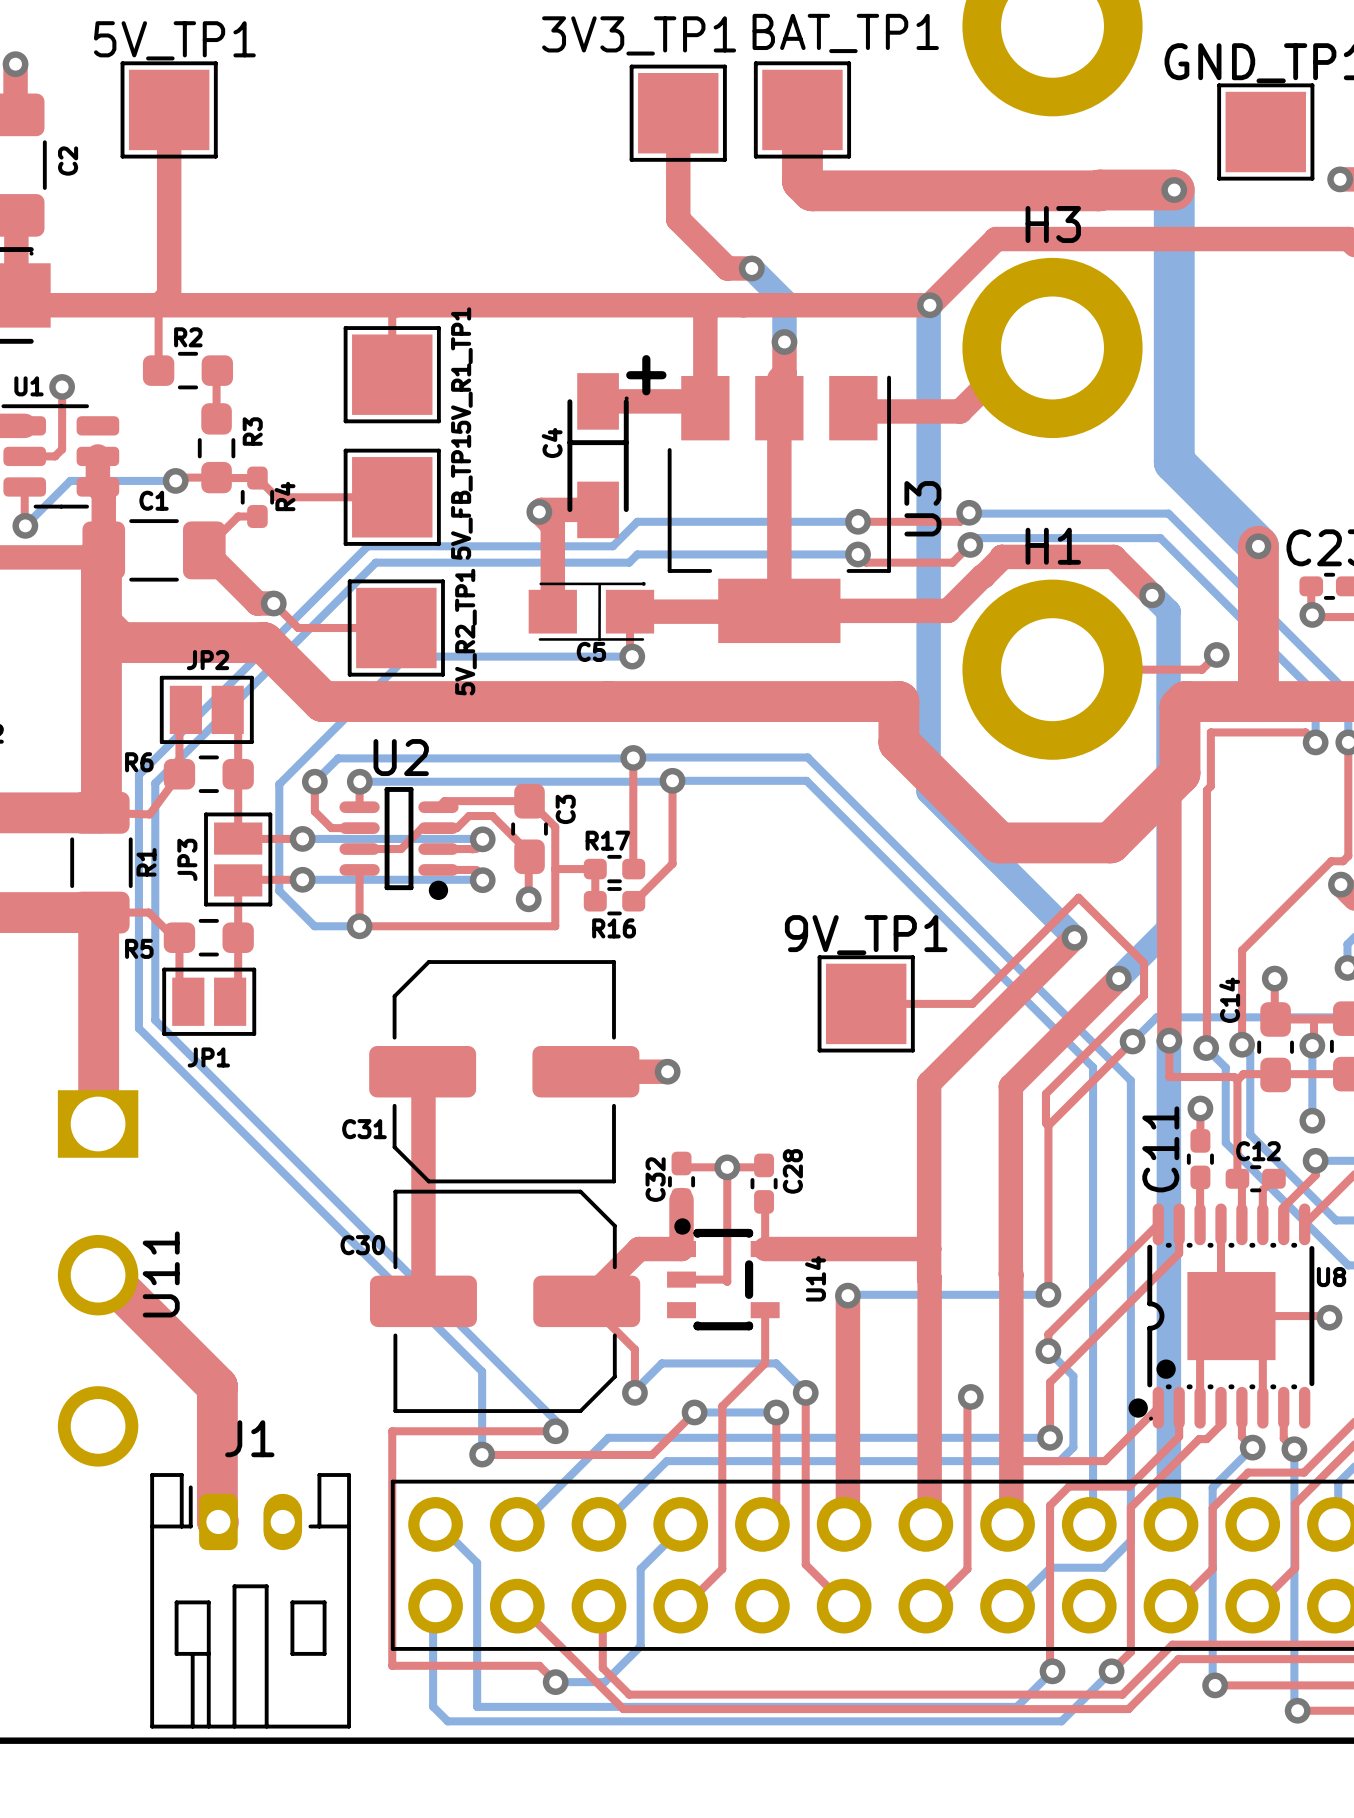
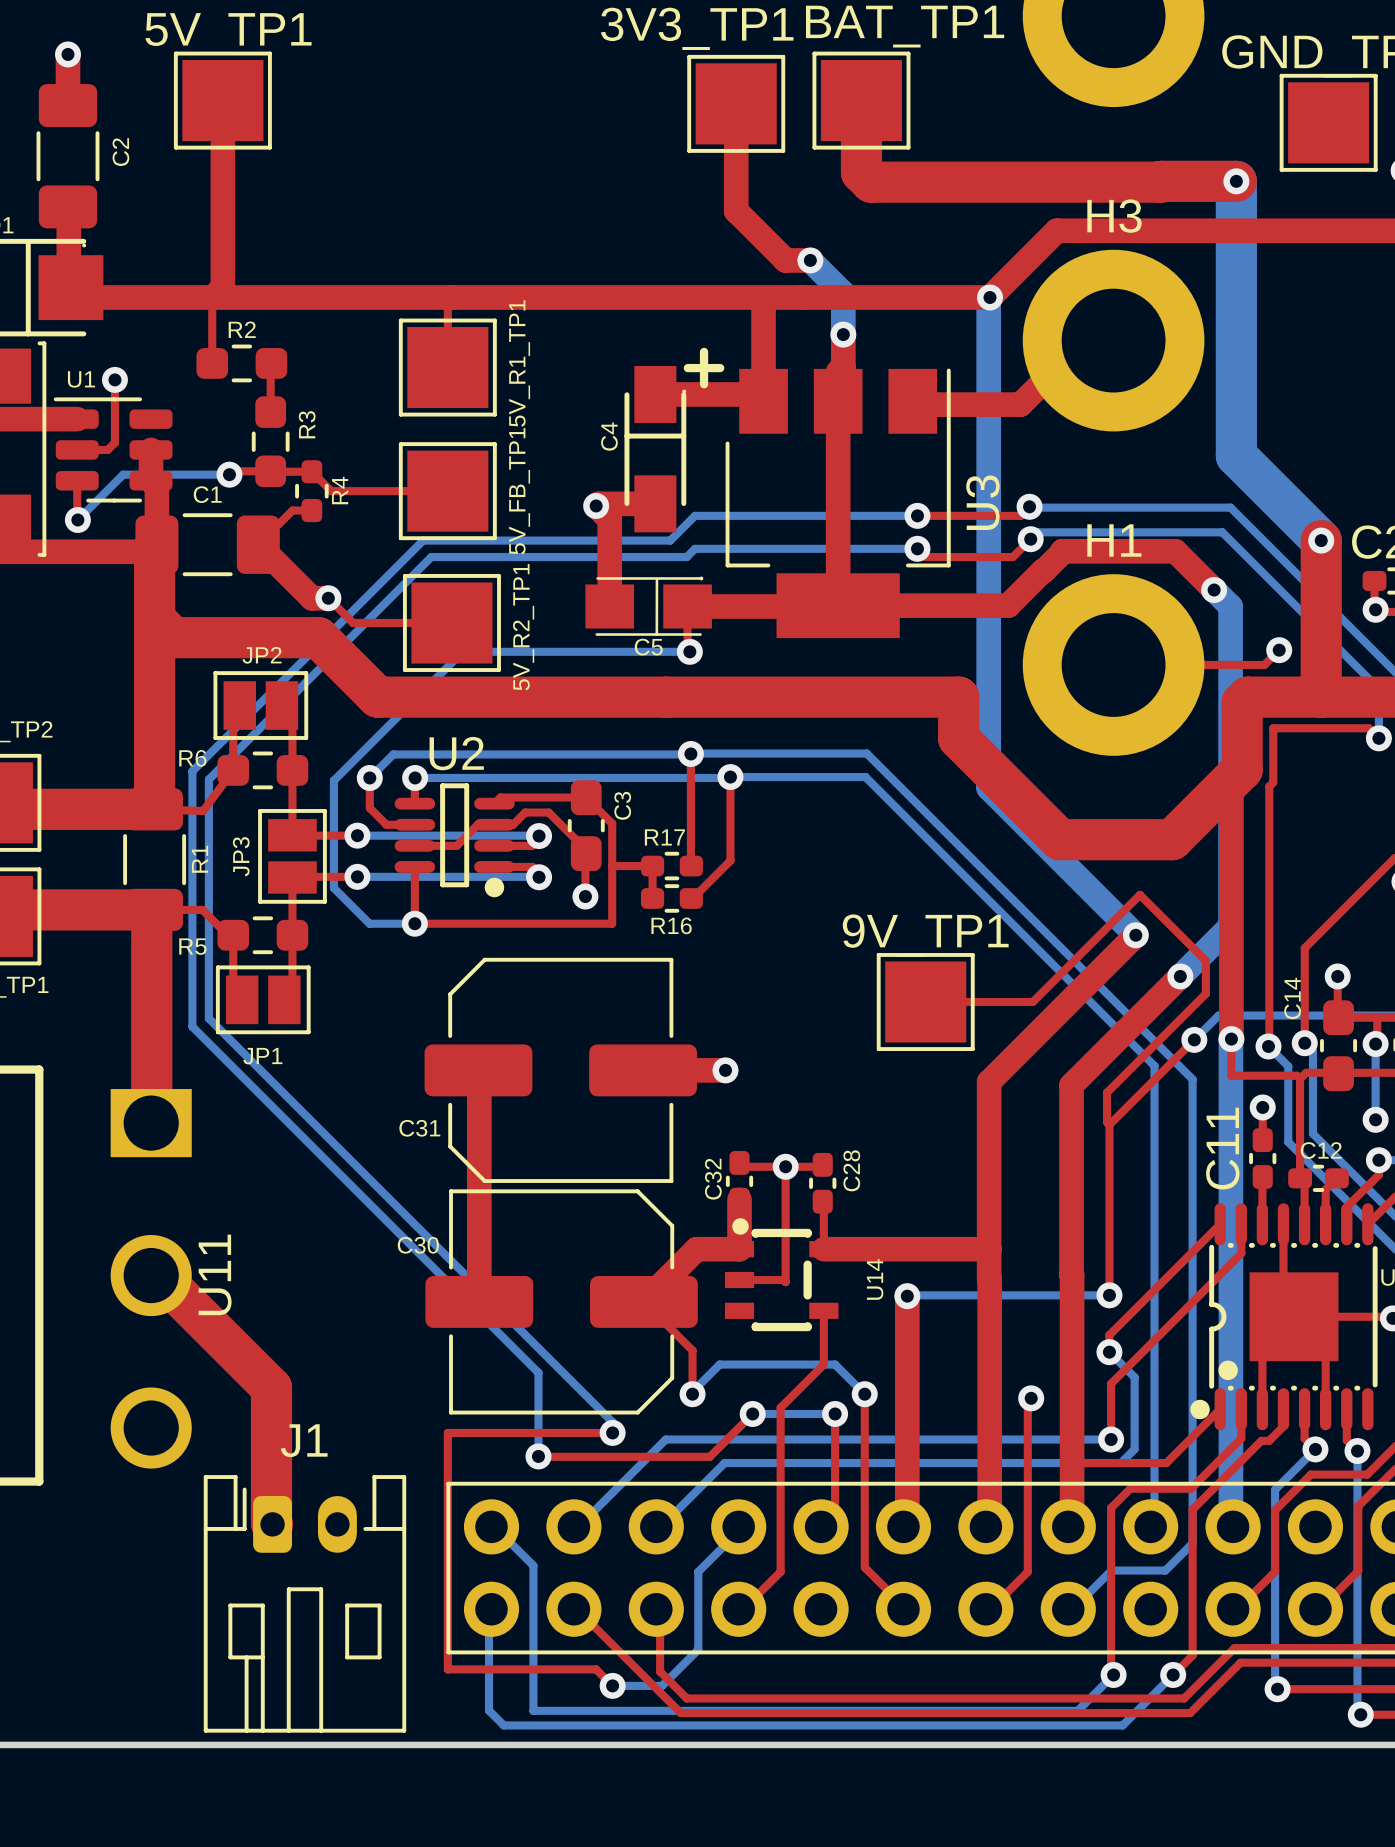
U8 footprint: [1128, 1203, 1315, 1429] -> [1190, 1203, 1378, 1431]

